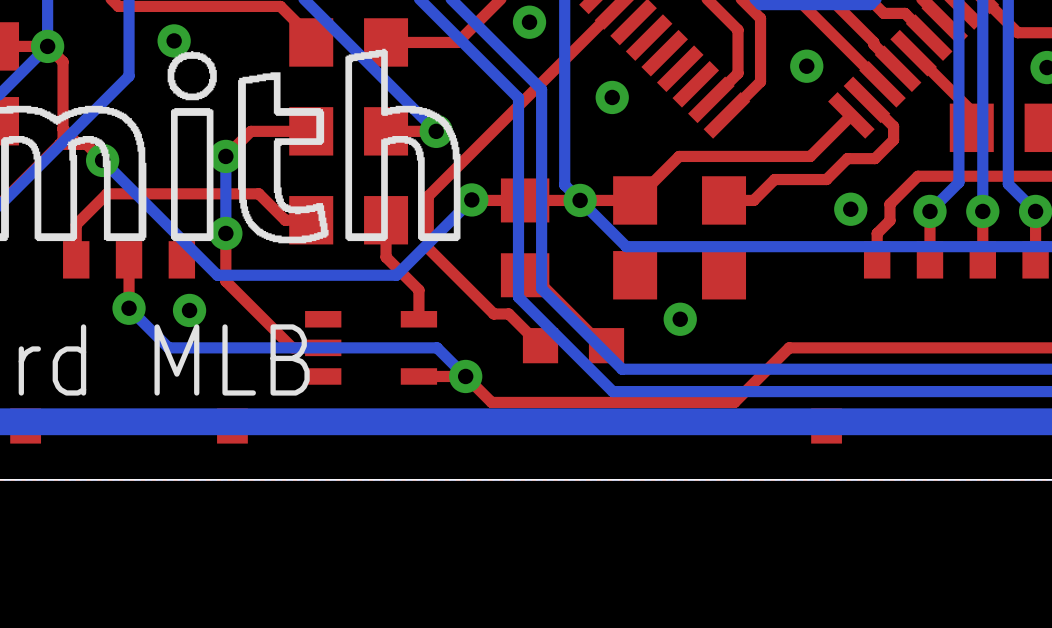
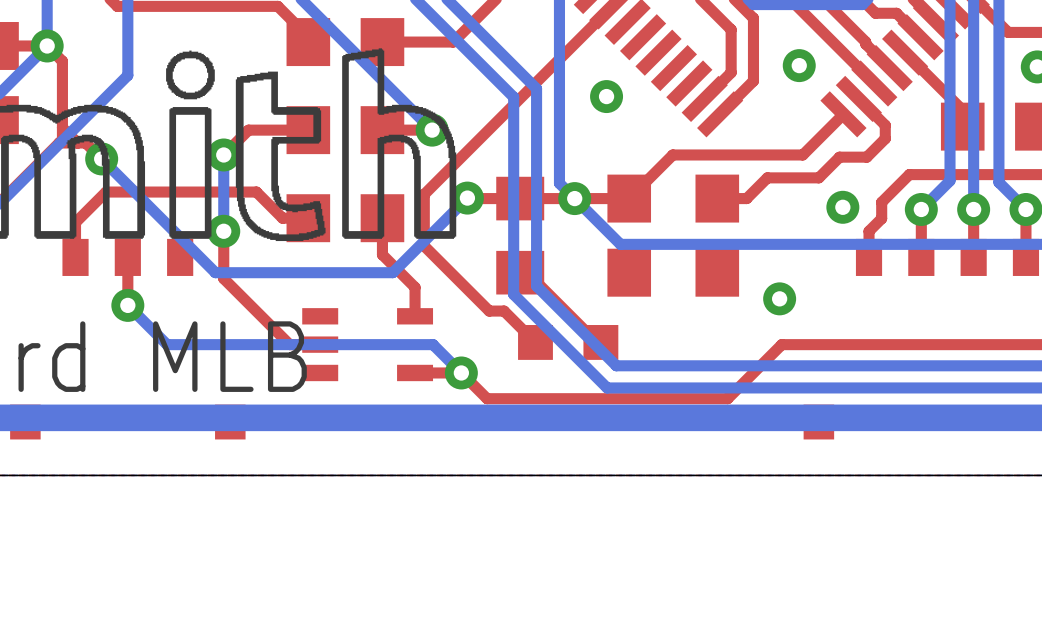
via: (529, 22) -> none
via: (174, 40) -> none
via: (189, 310) -> none
via position: (680, 319) -> (779, 298)

